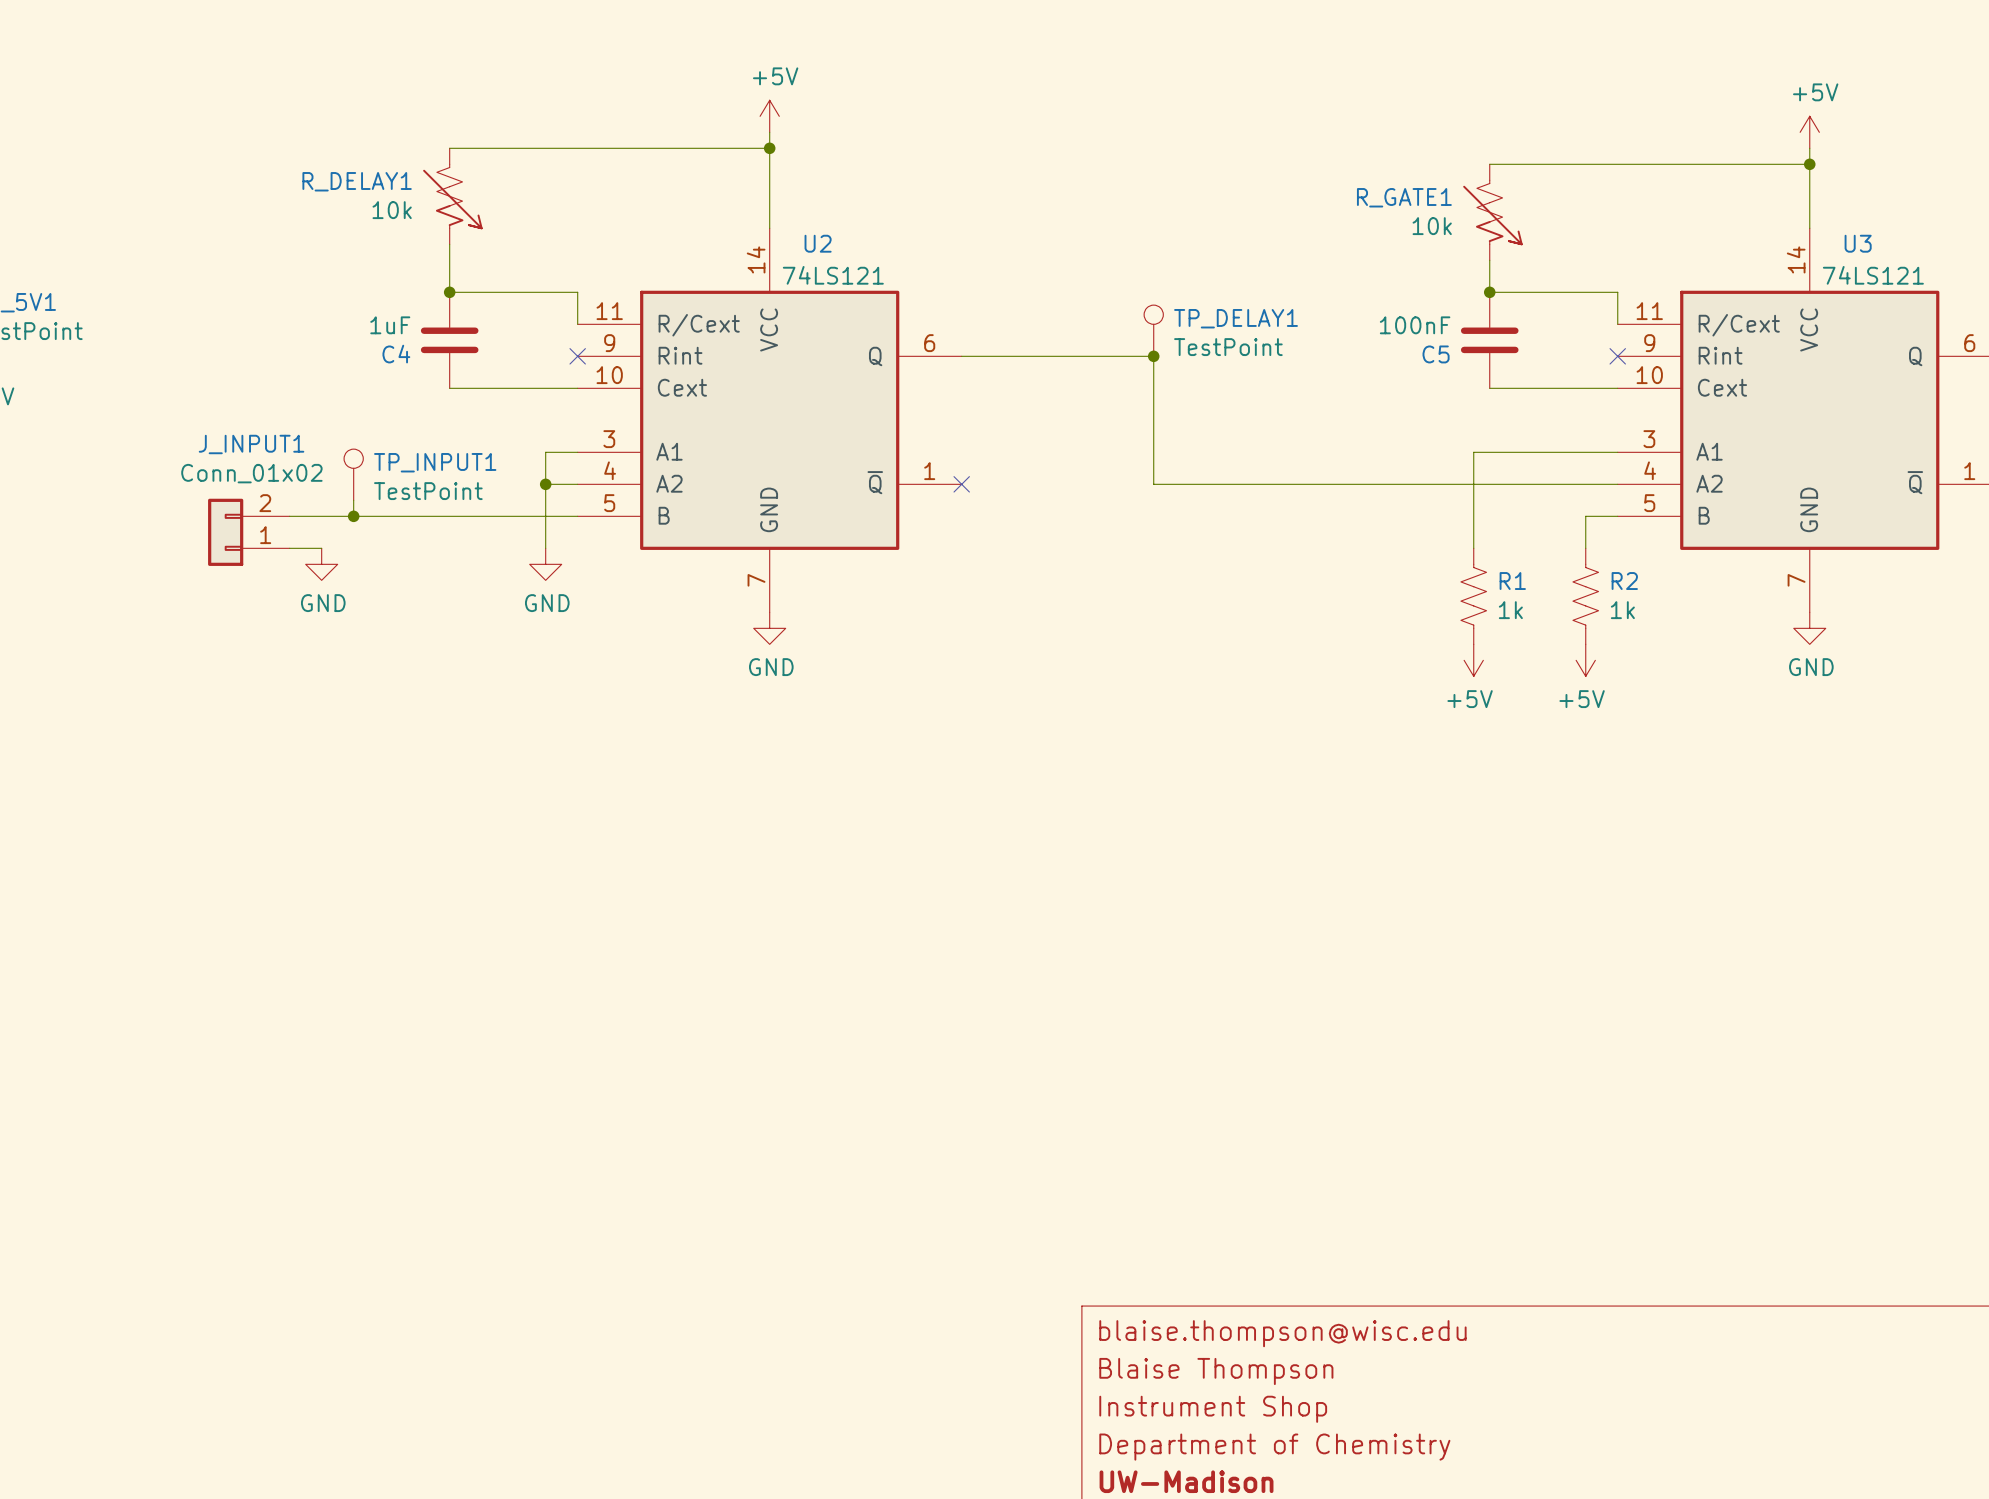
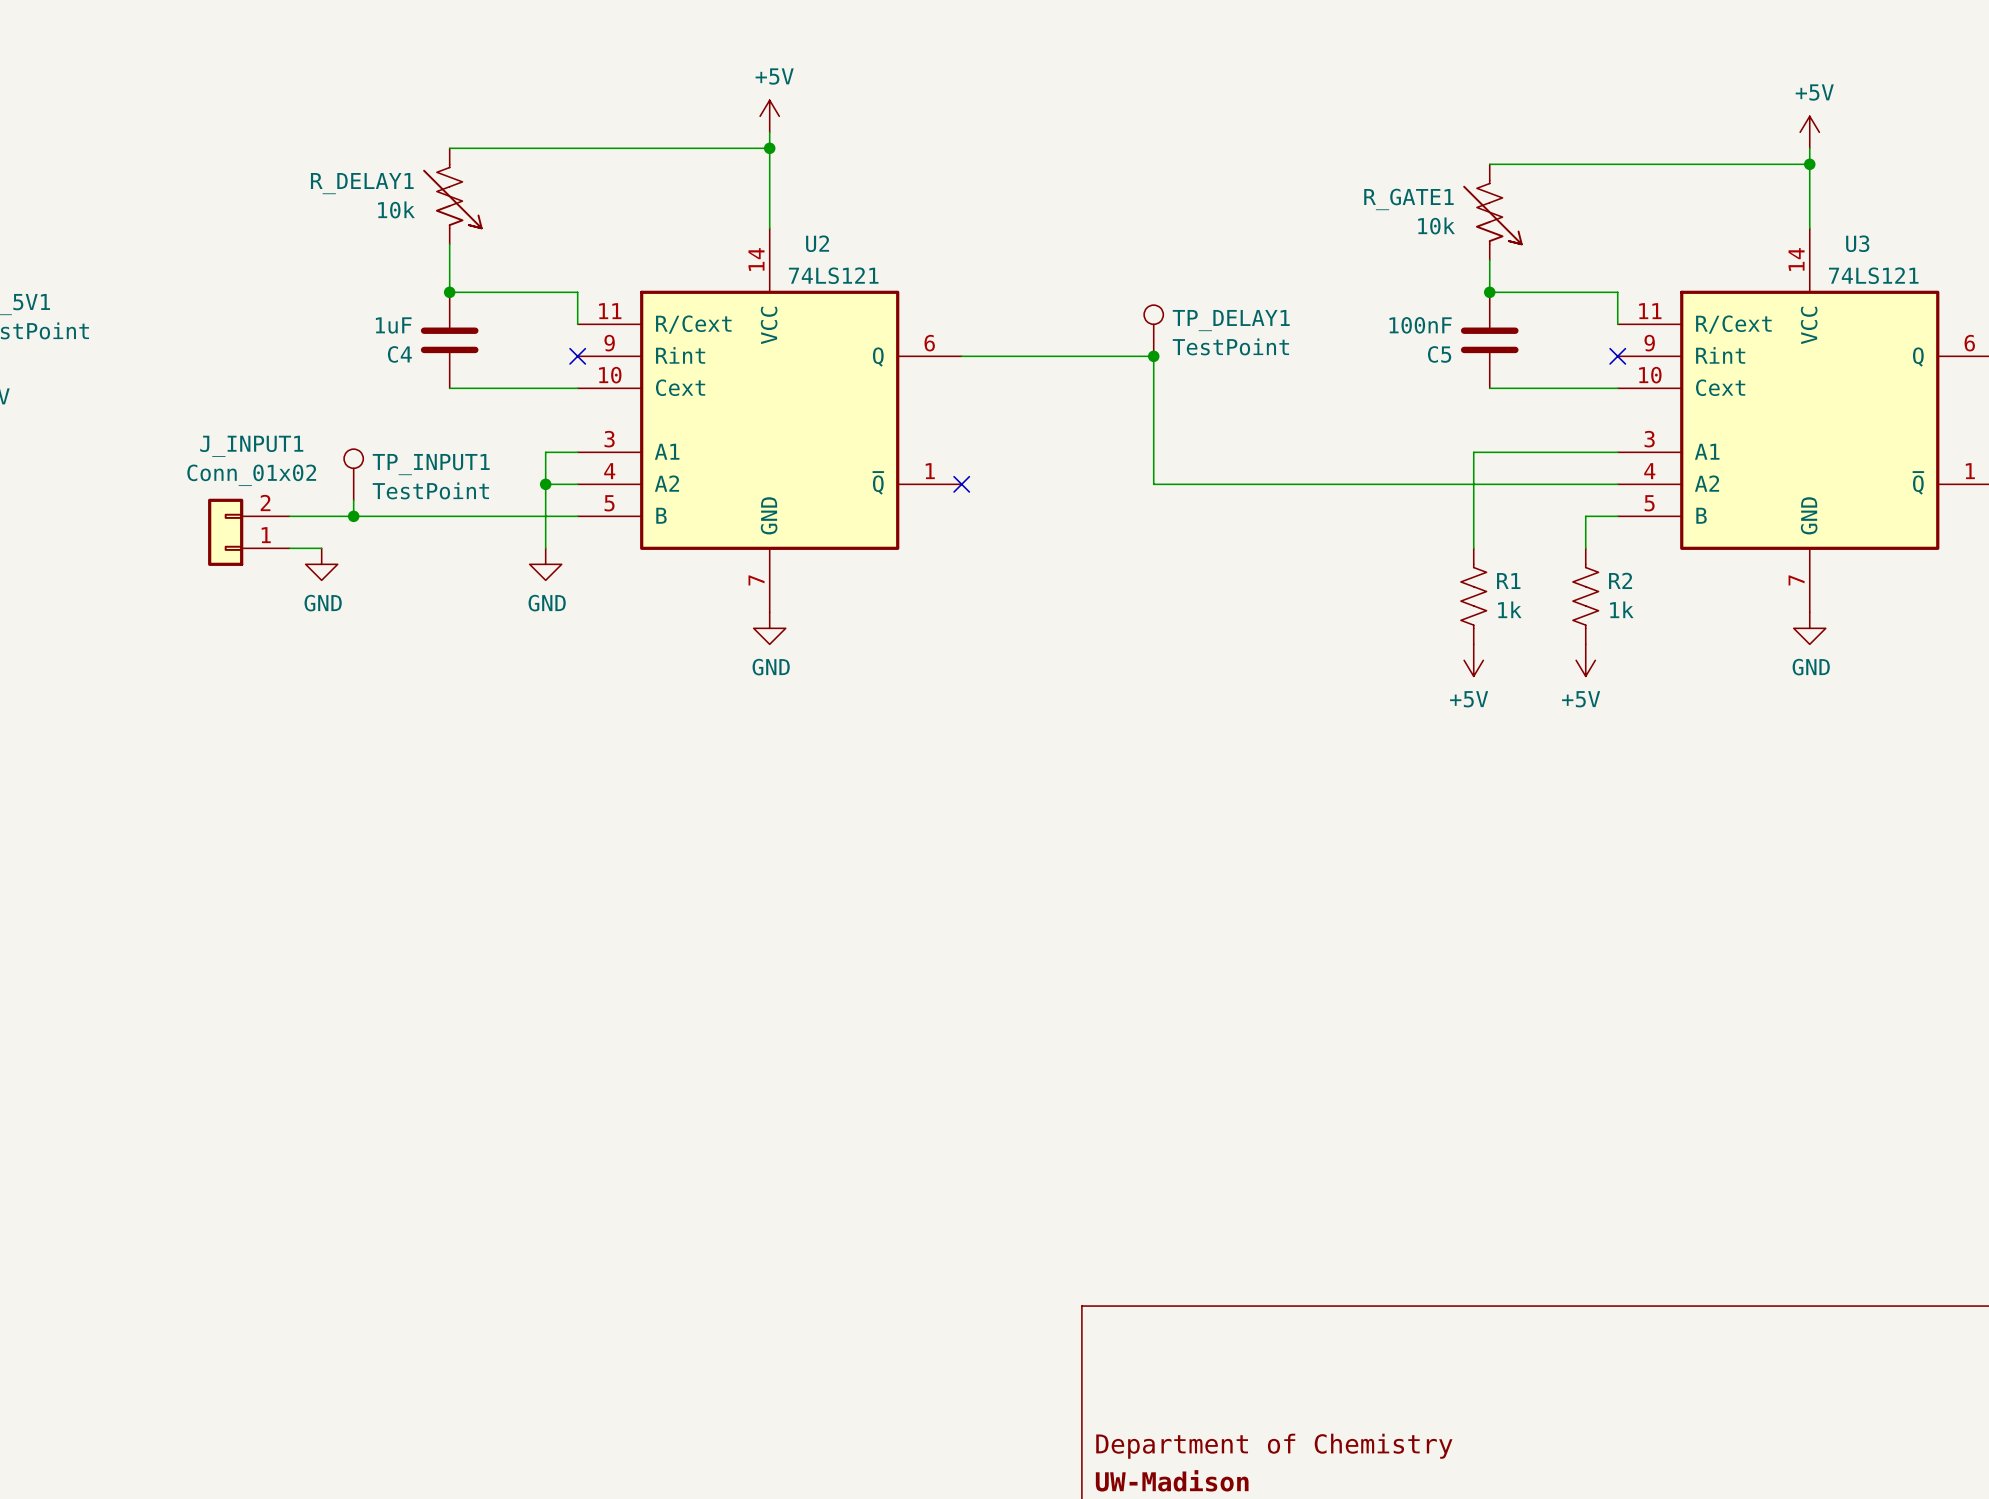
title block: blaise.thompson@wisc.edu (1282, 1333) -> none
title block: Blaise Thompson (1216, 1371) -> none
title block: Instrument Shop (1213, 1409) -> none

